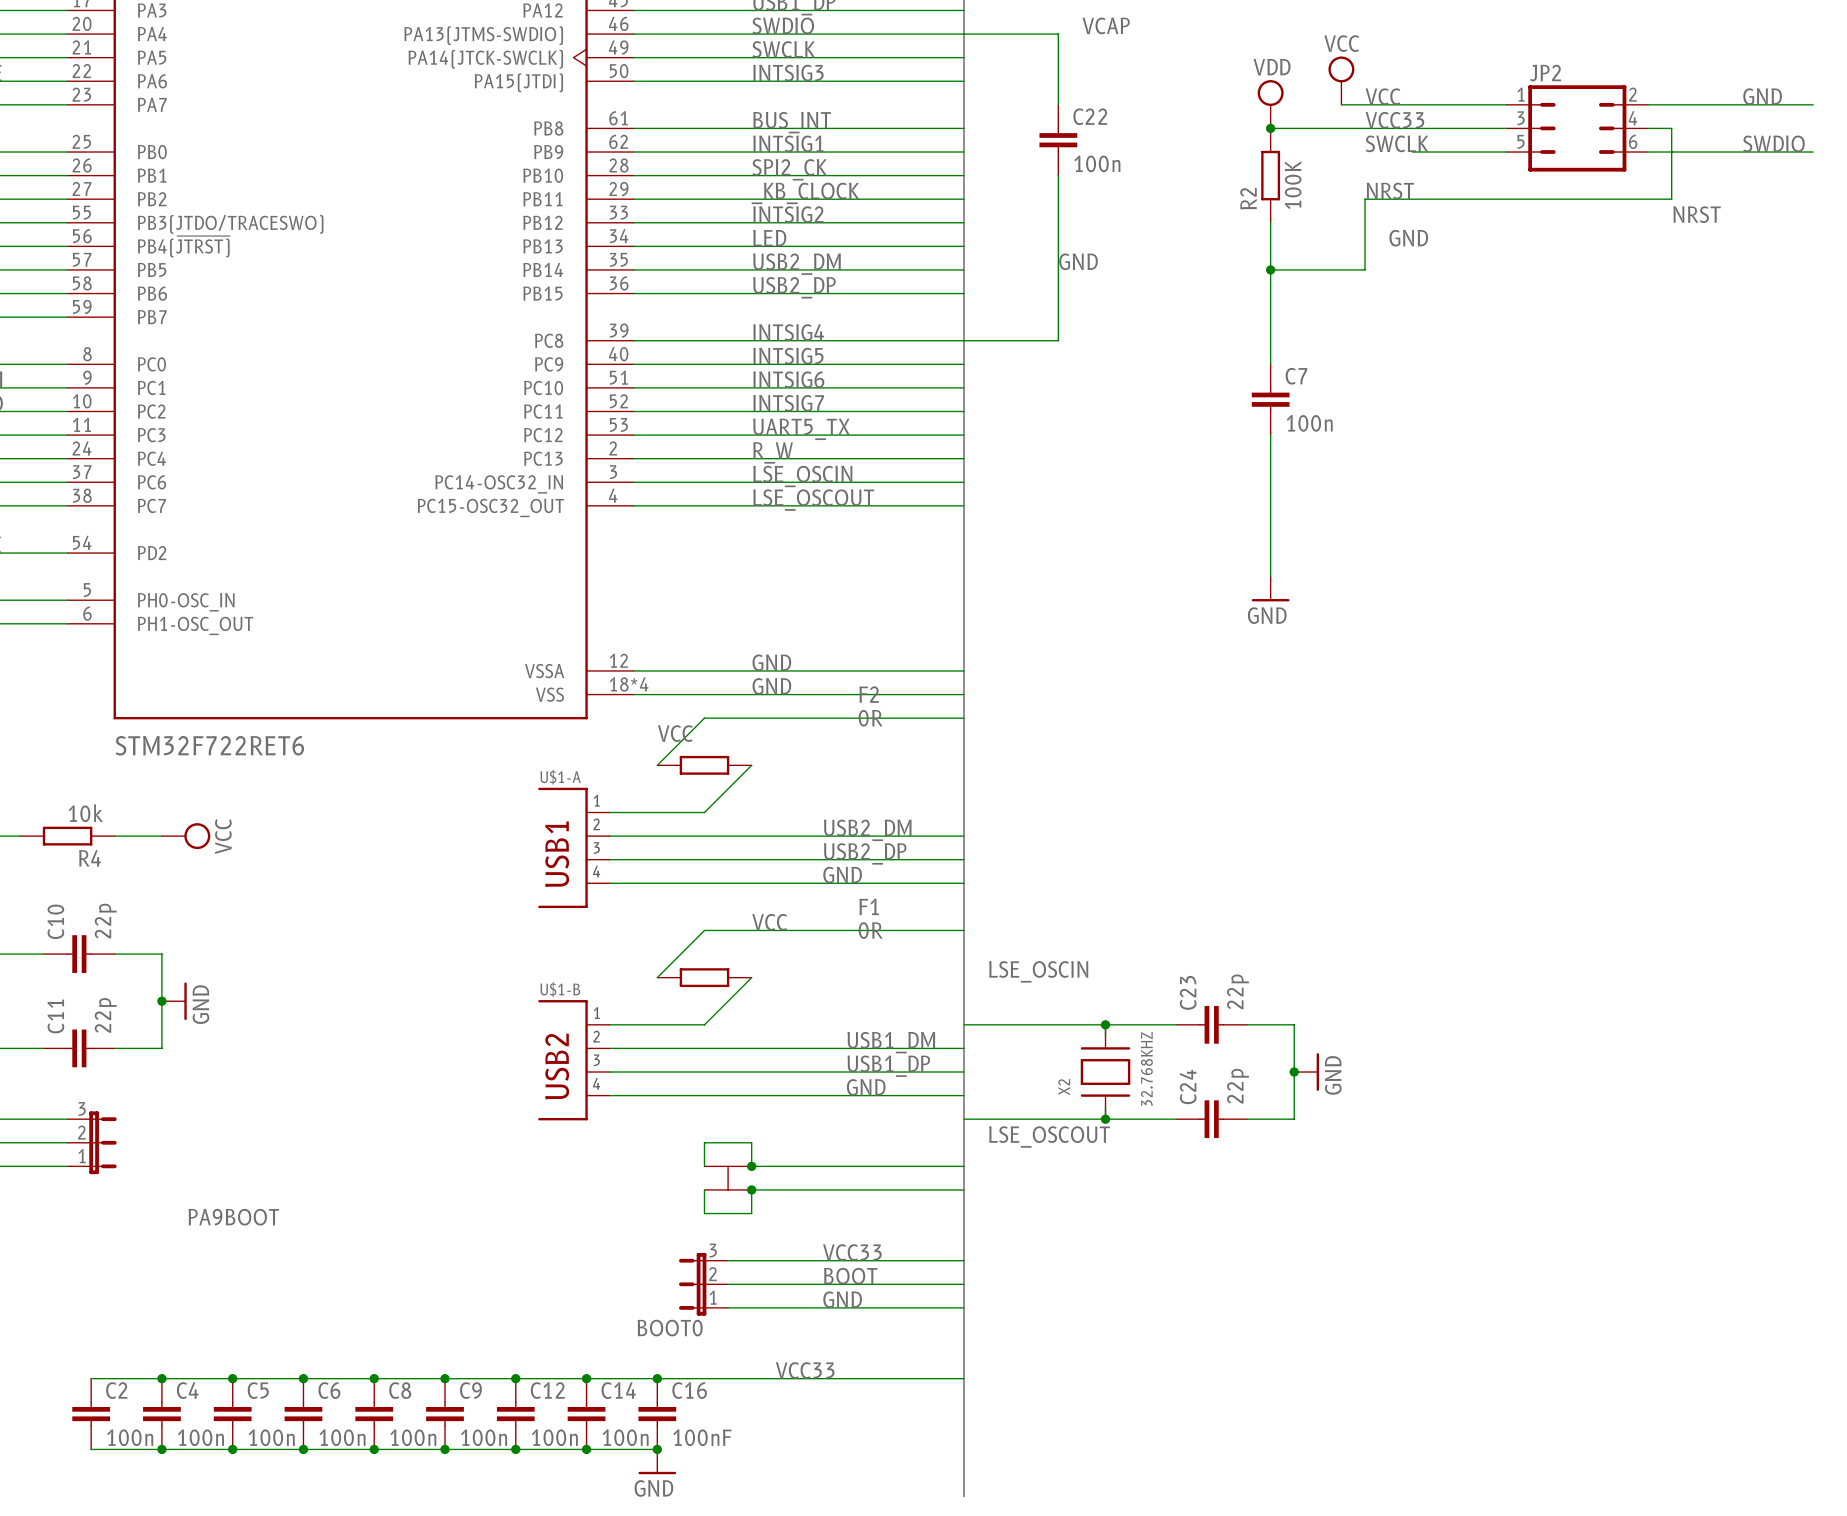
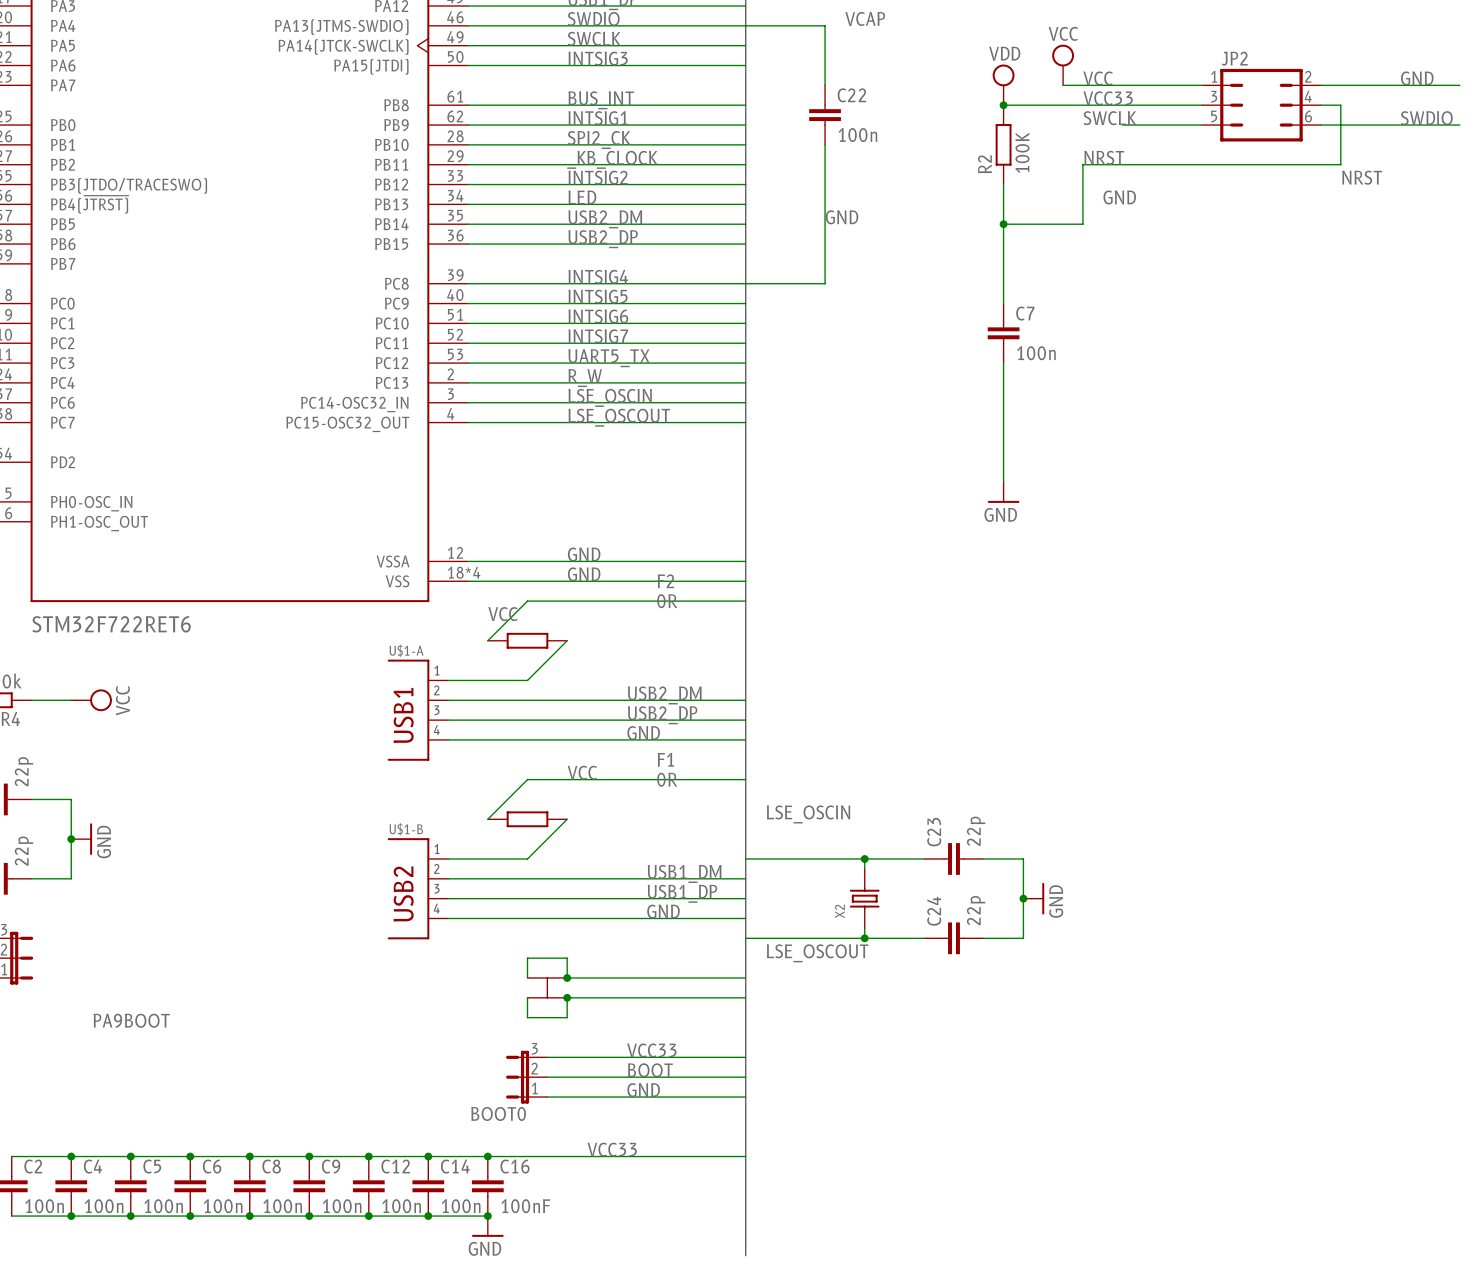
X2 symbol: [1080, 1024, 1131, 1120] -> [849, 868, 880, 929]
X2 value: 32.768KHZ (1146, 1068) -> none

